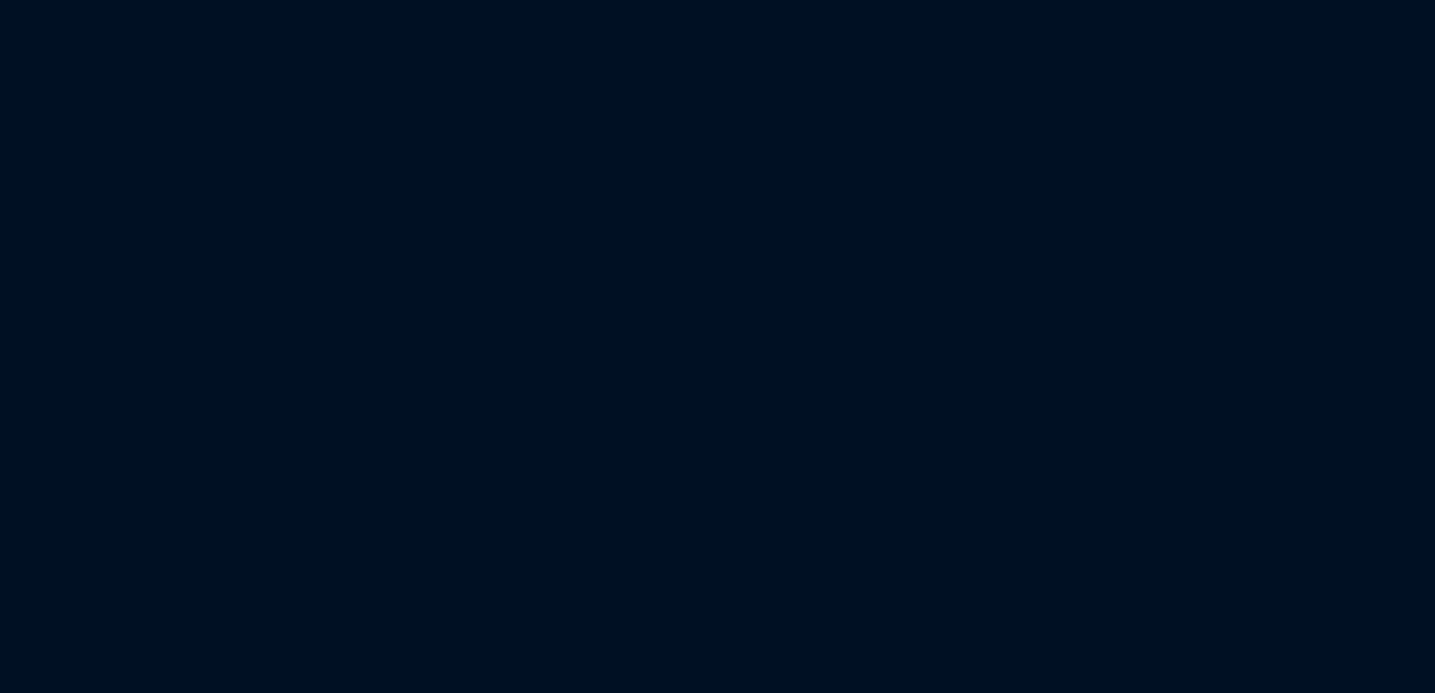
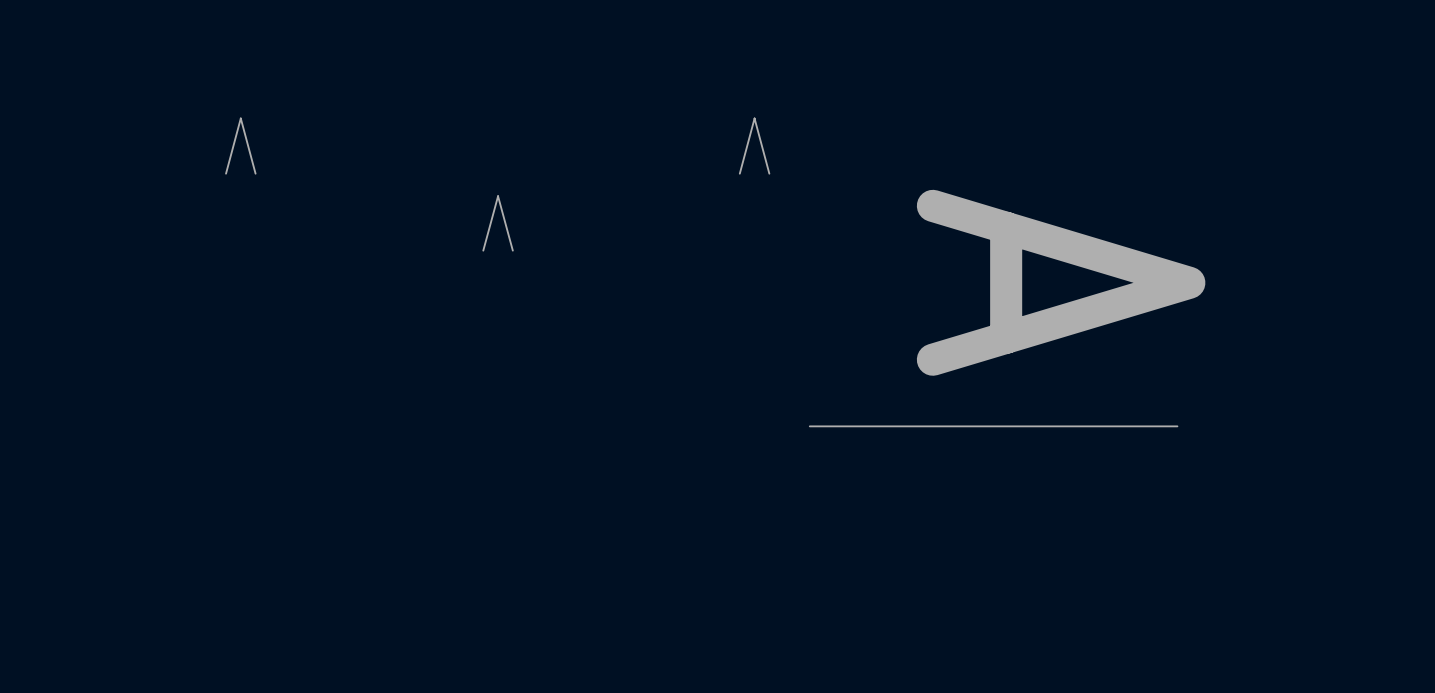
line: none -> (226, 173) (240, 118) (255, 173)
line: none -> (739, 173) (754, 118) (769, 173)
line: none -> (483, 250) (498, 196) (512, 250)
text: none -> A (1061, 282)
line: none -> (809, 426) (1177, 426)

